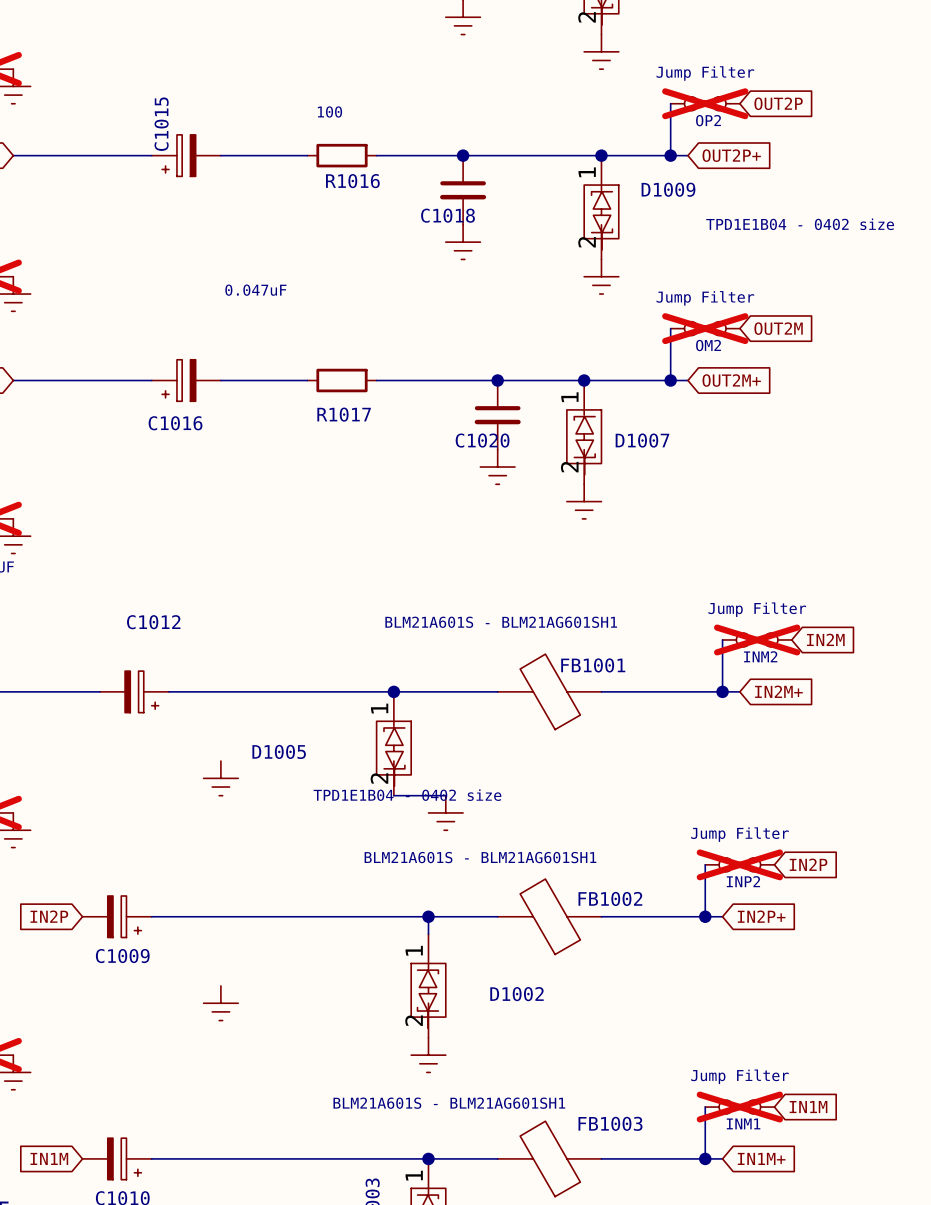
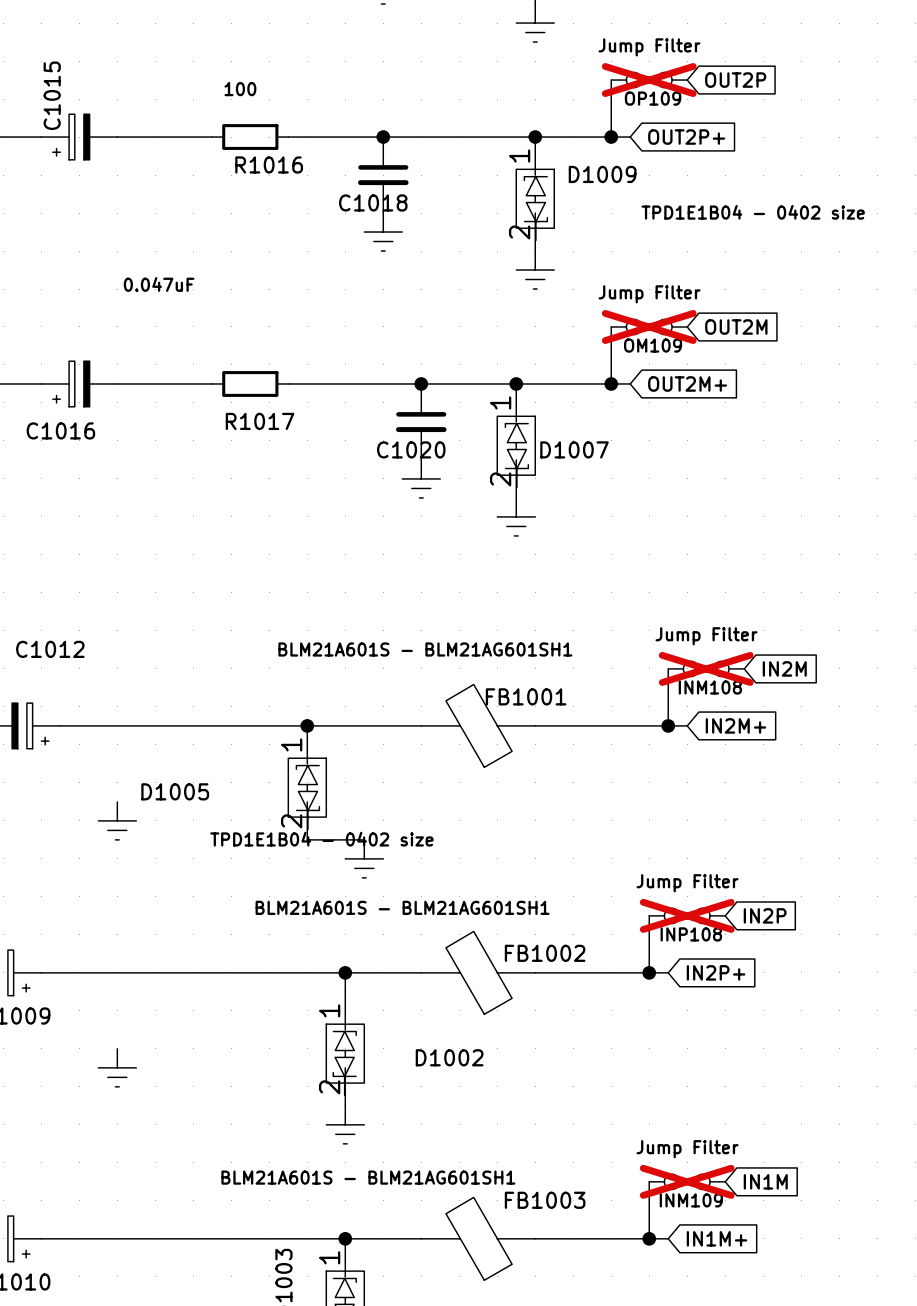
OP2 name: OP2 (708, 120) -> OP109 (653, 98)
OM2 name: OM2 (708, 345) -> OM109 (653, 345)
INM2 name: INM2 (760, 656) -> INM108 (710, 687)
INP2 name: INP2 (743, 881) -> INP108 (691, 934)
INM1 name: INM1 (743, 1123) -> INM109 (691, 1200)

